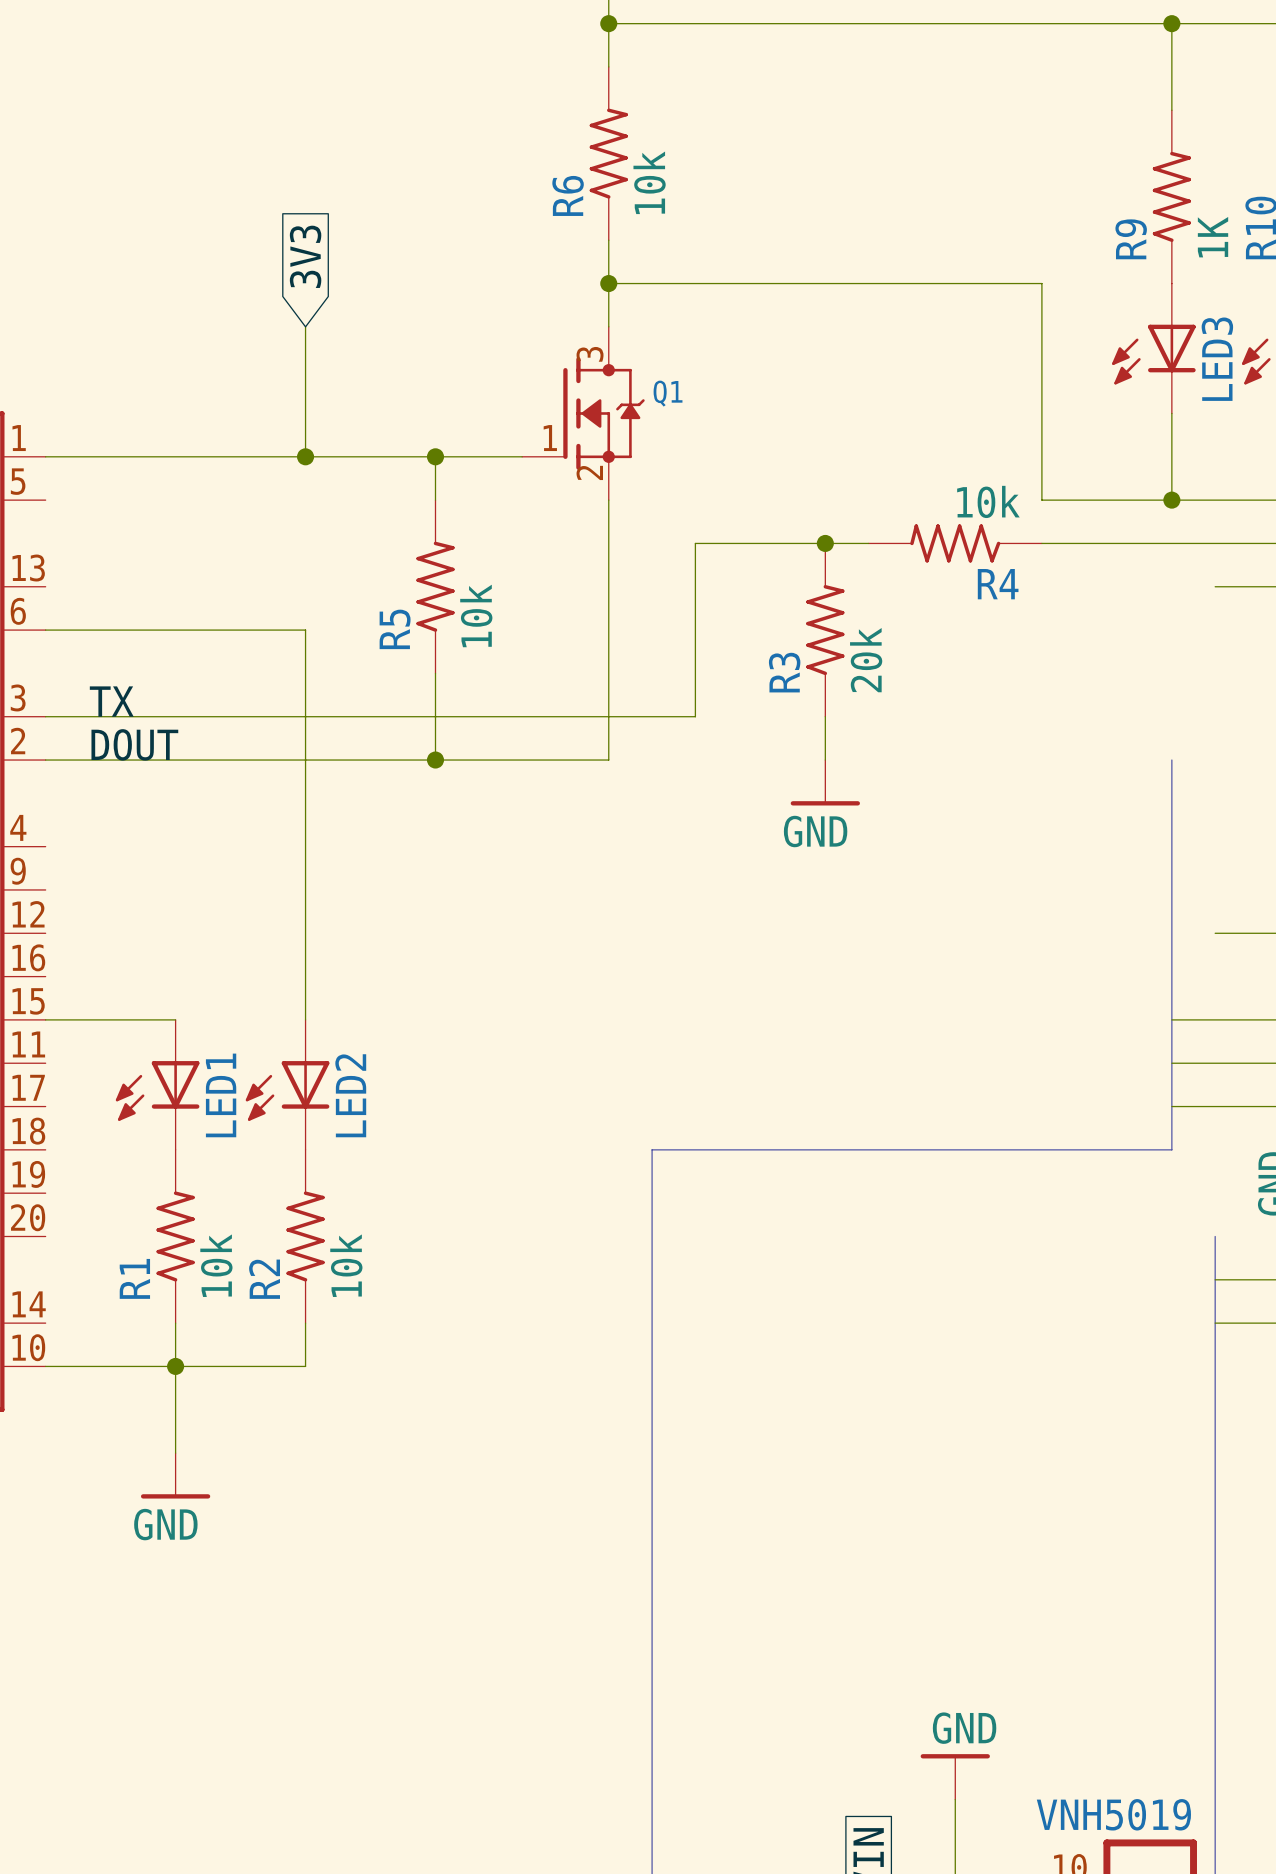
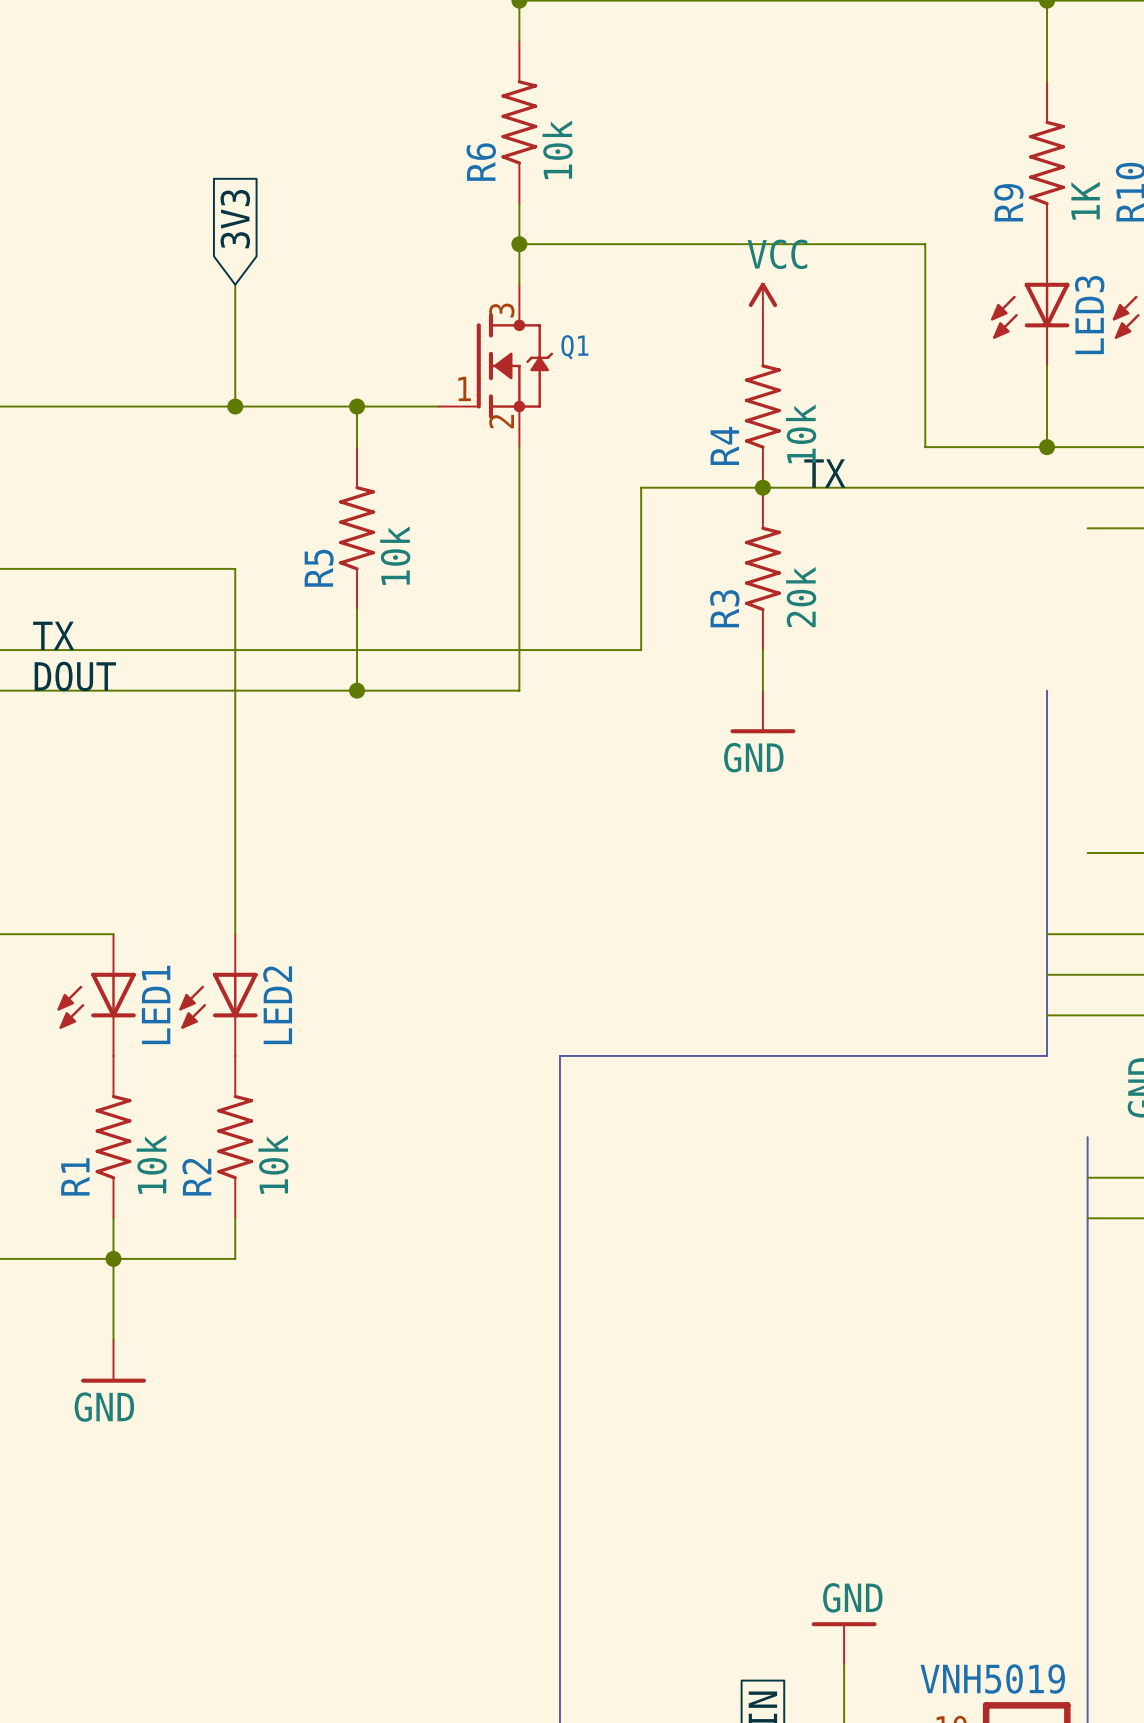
power symbol: none -> VCC (762, 304)
label: none -> TX (824, 473)
wire: (738, 543) (695, 543) (695, 716) -> (641, 487) (641, 650) (600, 650)
junction position: (825, 543) -> (762, 487)
R4 rotation: 0° (955, 543) -> 90° clockwise (762, 406)
R4 position: (955, 543) -> (762, 406)
R3 position: (825, 630) -> (762, 568)
wire: (825, 716) (825, 760) -> (762, 650) (762, 690)
power symbol position: GND (825, 782) -> GND (762, 711)

